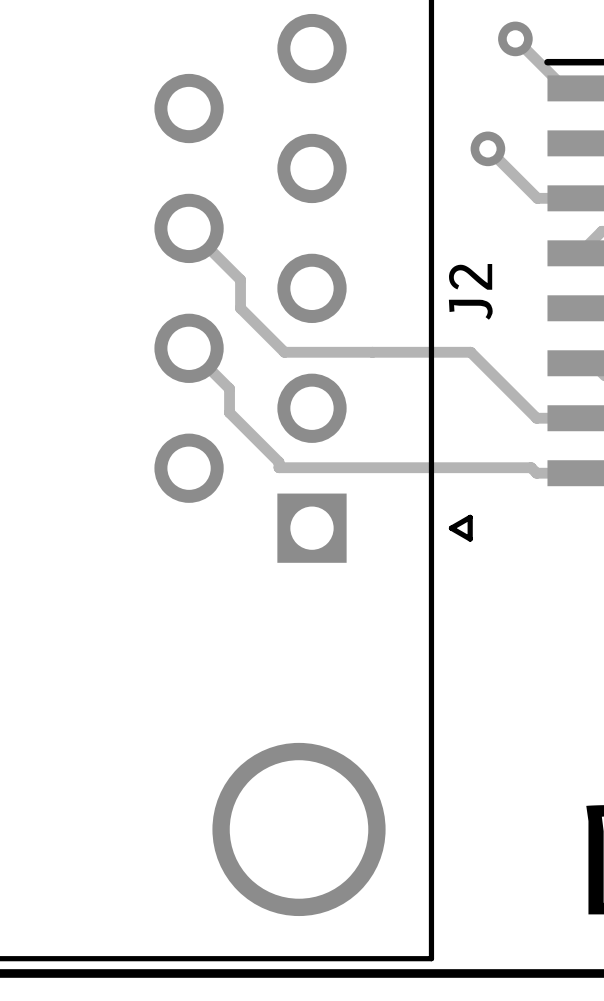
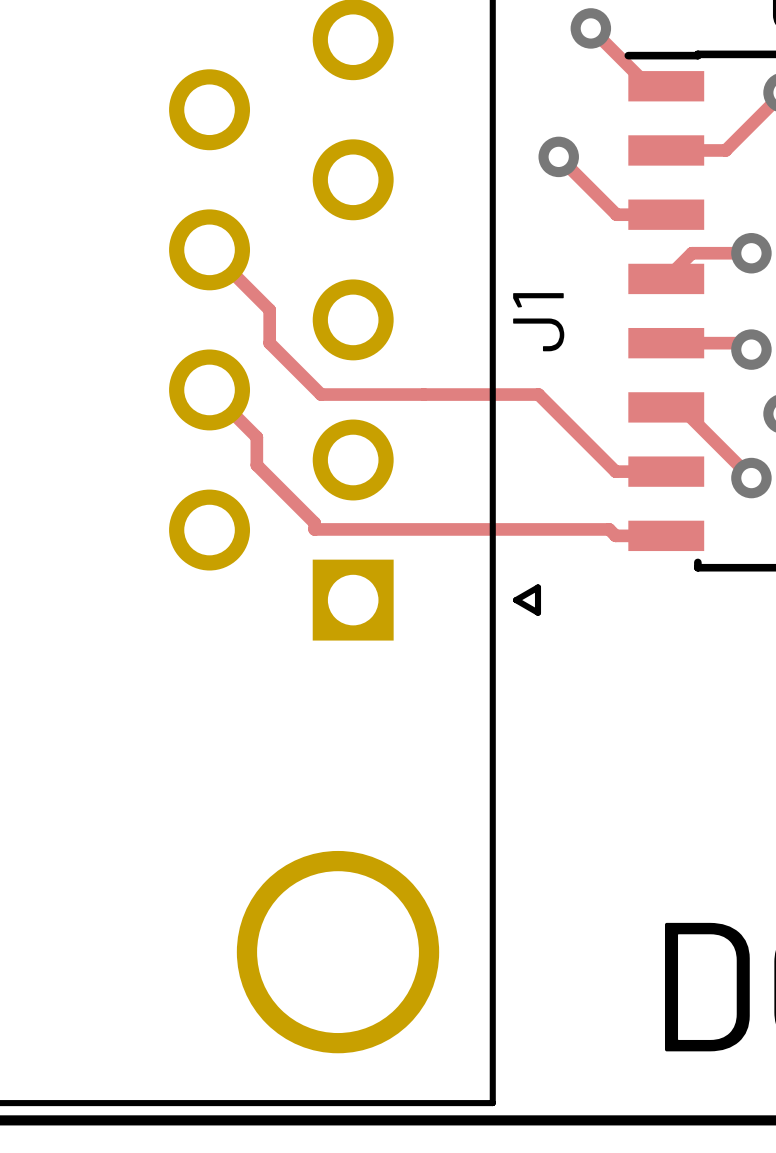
J2 name: J2 (470, 291) -> J1 (538, 322)

